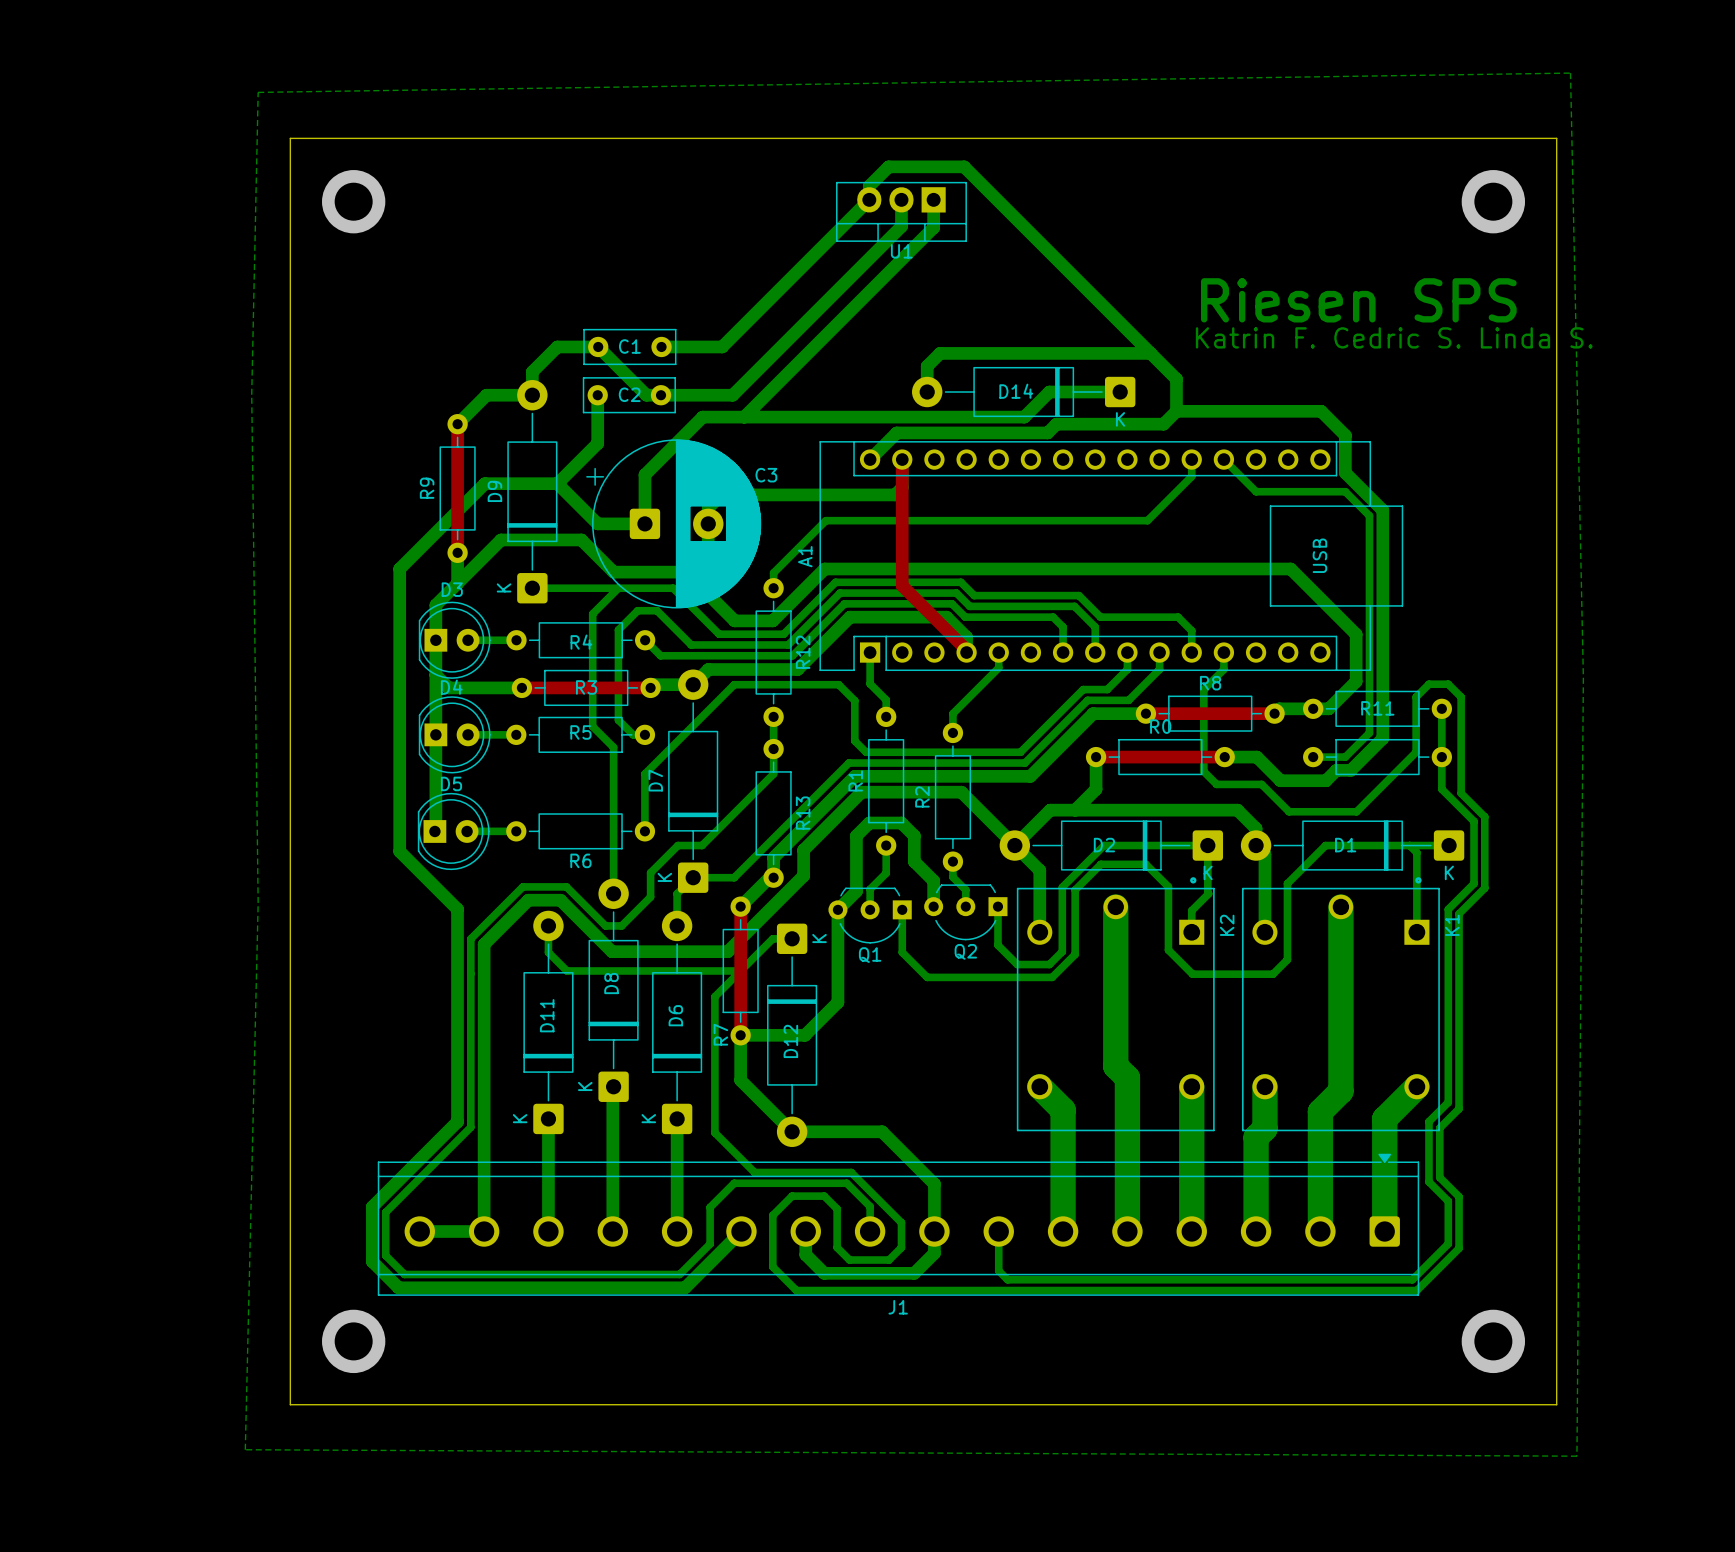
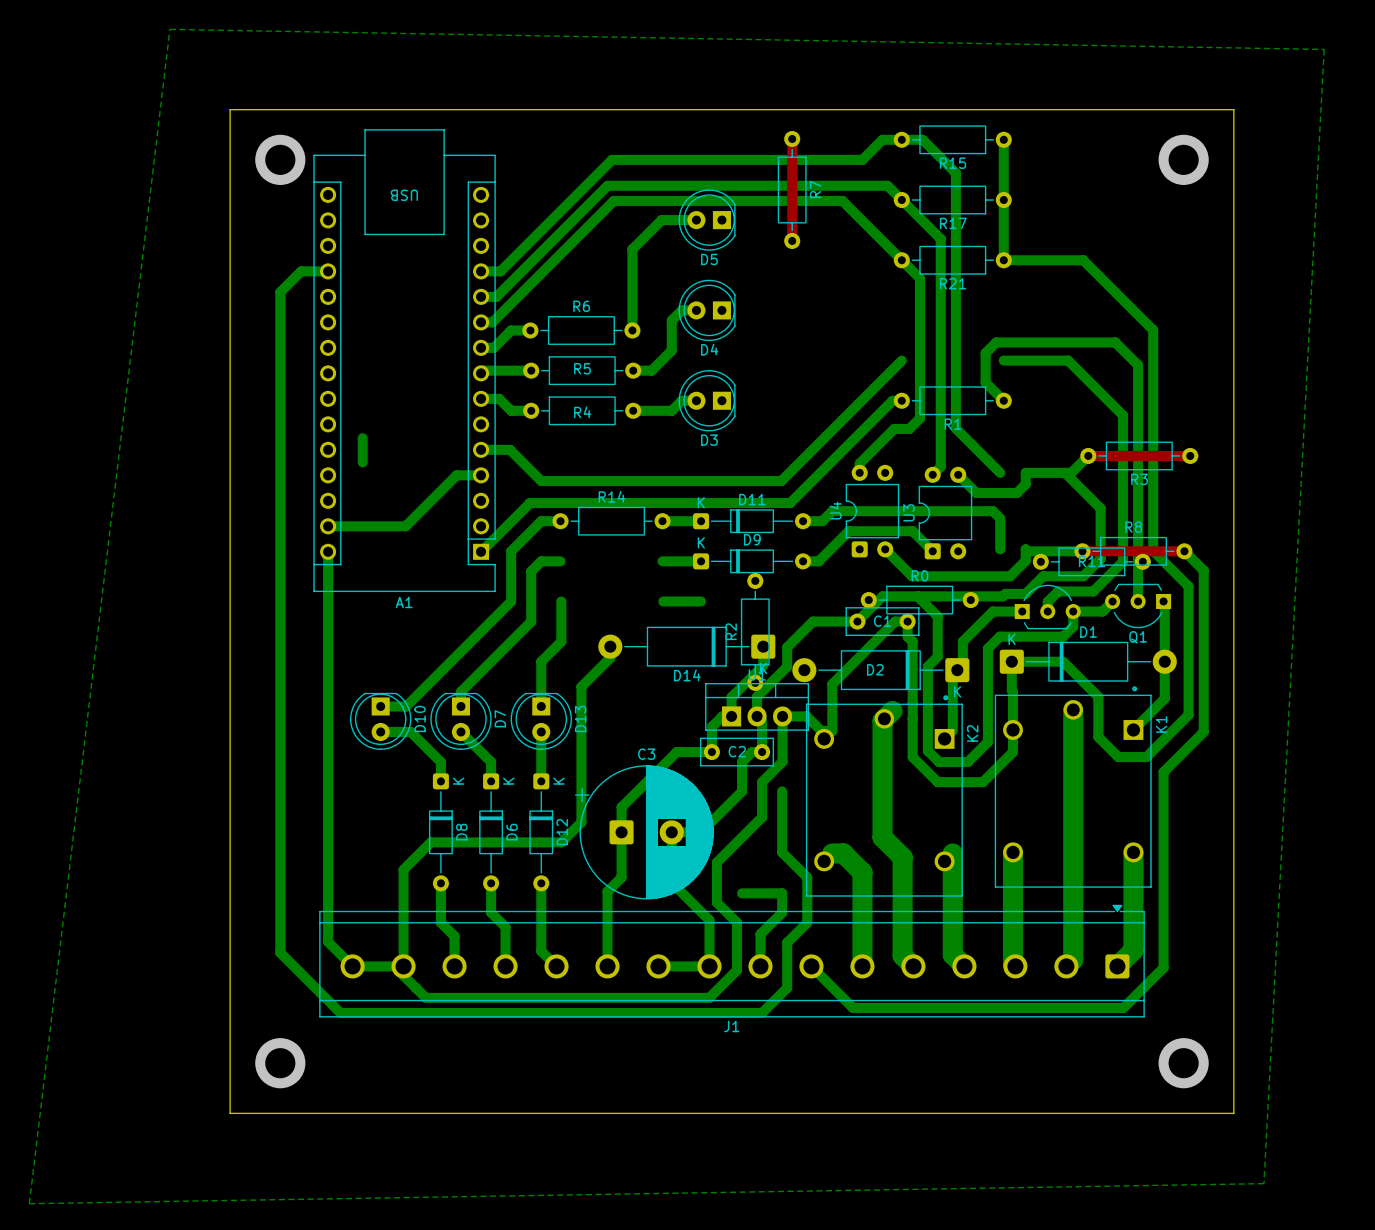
bottom zone outline: (1570, 73) (258, 92) (251, 394) (258, 902) (245, 1449) (1576, 1456) (1583, 677) (1570, 73) -> (169, 29) (29, 1203) (1263, 1183) (1324, 49) (169, 29)
top track: none -> (792, 138) (792, 240)
R15: none -> (952, 139)
bottom track: none -> (1003, 139) (1003, 260) (1083, 260) (1153, 330) (1153, 551) (1188, 586) (1188, 714) (1146, 757) (1118, 757) (1098, 736) (1098, 696) (1063, 661) (1006, 661)
bottom track: (901, 199) (901, 226) (732, 395) (646, 395) (598, 346) (557, 346) (532, 371) (532, 395) (486, 395) (457, 424) -> none
bottom track: (933, 199) (933, 227) (744, 417) -> none
U1 rotation: 0° (901, 211) -> 180° (757, 706)
U1 position: (901, 211) -> (757, 706)
R17: none -> (952, 200)
bottom track: none -> (696, 220) (661, 220) (632, 249) (632, 330)
text: Riesen SPS (1358, 300) -> none
R21: none -> (952, 260)
text: Katrin F. Cedric S. Linda S. (1394, 337) -> none
bottom track: none -> (328, 271) (301, 271) (280, 292) (280, 952) (340, 1013) (762, 1013) (787, 987) (787, 942) (807, 922) (807, 877) (782, 852) (782, 791)
bottom track: none -> (481, 271) (500, 271) (612, 159) (862, 159) (882, 139) (922, 139) (955, 173) (955, 428) (1000, 472)
C1 position: (629, 346) -> (882, 621)
bottom track: (661, 346) (722, 346) (869, 199) (869, 186) (888, 166) (964, 166) (1176, 379) (1176, 411) -> none
bottom track: (1150, 353) (940, 353) (927, 366) (927, 392) -> none
bottom track: none -> (481, 296) (496, 296) (607, 185) (887, 185) (940, 238) (940, 466) (932, 474)
D9 footprint: [507, 380, 558, 604] -> [693, 549, 812, 574]
bottom track: none -> (696, 310) (681, 310) (671, 320) (671, 350) (651, 370) (633, 370)
D14 name position: D14 (1016, 391) -> D14 (687, 675)
D14 position: (1023, 392) -> (686, 646)
bottom track: (1120, 392) (1049, 392) (1024, 417) (702, 417) (644, 474) (644, 523) (597, 523) (557, 483) -> none
bottom track: (597, 395) (597, 443) (557, 483) -> none
C2 position: (629, 395) -> (736, 752)
bottom track: none -> (481, 322) (492, 322) (613, 200) (842, 200) (919, 278) (919, 418) (909, 428) (894, 428) (859, 463) (859, 472)
bottom track: (1176, 411) (1321, 411) (1345, 435) (1345, 472) (1382, 510) (1382, 738) (1350, 770) (1336, 770) (1326, 780) (1280, 780) (1256, 757) (1224, 757) -> none
bottom track: (1176, 411) (1163, 424) (1056, 424) (1047, 432) (896, 432) (870, 459) -> none
bottom track: none -> (530, 330) (511, 330) (493, 347) (481, 347)
top track: (457, 424) (457, 552) -> none
bottom track: none -> (901, 360) (781, 481) (541, 481) (510, 449) (481, 449)
bottom track: none -> (1003, 360) (1068, 360) (1122, 415) (1122, 561) (1093, 591) (1058, 591) (1047, 601) (1047, 611)
bottom track: (902, 459) (902, 487) (895, 494) (721, 494) (708, 508) (708, 549) (685, 572) -> none
top track: (902, 459) (902, 585) (966, 650) (966, 652) -> none
bottom track: (1191, 459) (1191, 476) (1147, 520) (825, 520) (773, 572) (773, 588) -> none
bottom track: (1223, 459) (1256, 491) (1345, 491) (1369, 515) (1369, 732) (1345, 757) (1313, 757) -> none
bottom track: none -> (531, 370) (483, 370) (481, 373)
C3 name position: C3 (766, 475) -> C3 (646, 754)
bottom track: (557, 483) (484, 483) (399, 568) (399, 851) (457, 909) (457, 1121) (372, 1206) (372, 1261) (398, 1287) (685, 1287) (741, 1231) -> none
R9: (457, 488) -> none
D9 name position: D9 (494, 491) -> D9 (752, 539)
bottom track: none -> (481, 398) (499, 398) (511, 410) (531, 410)
bottom track: none -> (696, 400) (681, 400) (671, 410) (633, 410)
bottom track: none -> (901, 400) (892, 400) (790, 503) (530, 503) (481, 551)
bottom track: none -> (1003, 400) (985, 382) (985, 353) (996, 342) (1115, 342) (1138, 365) (1138, 601)
C3 position: (673, 523) -> (644, 832)
A1 rotation: 0° (1111, 556) -> 90° counterclockwise (404, 360)
A1 position: (1111, 556) -> (404, 360)
bottom track: (685, 572) (734, 620) (772, 620) (824, 568) (1290, 568) (1356, 634) (1356, 681) (1328, 708) (1279, 708) (1274, 713) -> none
bottom track: (685, 572) (613, 572) (581, 539) (501, 539) (435, 605) (434, 831) -> none
bottom track: none -> (1088, 455) (1071, 472) (1025, 472) (1025, 484) (1016, 492) (976, 492) (958, 474)
top track: none -> (1088, 455) (1190, 455)
bottom track: (532, 588) (673, 588) (719, 634) (783, 634) (835, 582) (960, 582) (974, 595) (1078, 595) (1100, 617) (1178, 617) (1191, 630) (1191, 652) -> none
bottom track: (618, 588) (592, 613) (592, 726) (613, 747) (613, 893) -> none
bottom track: none -> (1065, 472) (1100, 508) (1100, 559) (1083, 576) (1043, 576) (1025, 593) (1005, 593) (1002, 596) (882, 596) (857, 621) (813, 621) (787, 647) (787, 666) (757, 696) (757, 716) (762, 721) (762, 752) (752, 752) (742, 762) (742, 791) (701, 832) (671, 832) (671, 882) (709, 920) (709, 966) (658, 966)
bottom track: none -> (481, 475) (456, 475) (405, 526) (328, 526)
D3 rotation: 0° (454, 640) -> 180° (707, 400)
D3 position: (454, 640) -> (707, 400)
bottom track: (468, 640) (516, 640) -> none
R4 position: (580, 640) -> (582, 410)
bottom track: (645, 640) (660, 655) (792, 655) (844, 603) (952, 603) (965, 617) (1053, 617) (1063, 627) (1063, 652) -> none
U4: none -> (872, 511)
U3: none -> (945, 513)
R12: (773, 652) -> none
bottom track: (870, 652) (870, 683) (886, 699) (886, 716) -> none
bottom track: (966, 652) (966, 637) (946, 617) (850, 617) (797, 669) (708, 669) (693, 684) (653, 684) (650, 687) -> none
bottom track: (998, 652) (998, 667) (952, 713) (952, 732) -> none
bottom track: (1095, 652) (1095, 627) (1074, 606) (969, 606) (956, 593) (840, 593) (788, 644) (691, 644) (657, 610) (637, 610) (618, 630) (618, 720) (633, 734) (644, 734) -> none
bottom track: (1127, 652) (1127, 669) (1107, 689) (1083, 689) (1020, 752) (866, 752) (854, 740) (854, 700) (838, 684) (734, 684) (644, 773) (644, 831) -> none
bottom track: (1159, 652) (1159, 669) (1128, 700) (1087, 700) (1024, 763) (848, 763) (734, 877) (693, 877) (677, 893) (677, 925) -> none
bottom track: (1223, 652) (1223, 669) (1203, 689) (1203, 771) (1216, 784) (1261, 784) (1289, 811) (1356, 811) (1416, 752) (1416, 697) (1428, 684) (1448, 684) (1461, 697) (1461, 793) (1484, 816) (1484, 888) (1459, 913) (1459, 1108) (1439, 1128) (1439, 1177) (1459, 1196) (1459, 1248) (1416, 1290) (796, 1290) (772, 1266) (772, 1215) (792, 1196) (824, 1196) (837, 1208) (837, 1247) (849, 1260) (889, 1260) (901, 1247) (901, 1222) (851, 1172) (754, 1172) (714, 1132) (714, 996) (772, 938) (792, 938) -> none
bottom track: none -> (560, 521) (541, 521) (511, 551) (511, 601) (406, 706) (380, 706)
R14: none -> (611, 521)
bottom track: none -> (662, 521) (701, 521)
bottom track: none -> (803, 521) (822, 521) (832, 511) (992, 511) (1000, 518) (1000, 549)
D7 footprint: [668, 669, 719, 893] -> [430, 692, 492, 750]
bottom track: (435, 675) (448, 687) (521, 687) -> none
top track: (521, 687) (650, 687) -> none
R3 position: (586, 687) -> (1139, 455)
R3 name position: R3 (586, 687) -> R3 (1139, 479)
bottom track: none -> (885, 549) (912, 576) (1010, 576) (1025, 560) (1025, 549) (1027, 551) (1082, 551)
bottom track: none -> (932, 551) (912, 531) (848, 531) (818, 561) (803, 561)
bottom track: none -> (1184, 551) (1203, 570) (1203, 731) (1163, 772) (1163, 967) (1123, 1007) (853, 1007) (811, 966)
bottom track: none -> (328, 551) (328, 941) (352, 966) (403, 966)
bottom track: none -> (560, 561) (541, 561) (531, 571) (531, 621) (460, 691) (460, 706)
bottom track: none -> (662, 561) (701, 561)
bottom track: (1441, 708) (1441, 789) (1474, 821) (1474, 883) (1448, 909) (1448, 1102) (1428, 1121) (1428, 1181) (1448, 1201) (1448, 1243) (1412, 1279) (1007, 1279) (998, 1270) (998, 1231) -> none
bottom track: (1145, 713) (1093, 713) (1030, 776) (854, 776) (773, 857) (773, 877) (769, 877) (740, 906) -> none
top track: (1145, 713) (1274, 713) -> (1082, 551) (1184, 551)
R8 position: (1210, 713) -> (1133, 551)
bottom track: (773, 716) (773, 773) (702, 845) (677, 845) (650, 872) (650, 896) (621, 925) (605, 925) (566, 886) (522, 886) (470, 938) (470, 1127) (385, 1212) (385, 1255) (404, 1274) (679, 1274) (710, 1244) (710, 1207) (734, 1183) (846, 1183) (870, 1206) (870, 1231) -> none
D4 rotation: 0° (454, 734) -> 180° (707, 310)
D4 position: (454, 734) -> (707, 310)
bottom track: (468, 734) (516, 734) -> none
R5 position: (580, 734) -> (582, 370)
bottom track: none -> (917, 596) (937, 616) (937, 656) (927, 666) (927, 750) (939, 762) (967, 762) (987, 742) (987, 648) (999, 636) (1063, 636) (1073, 626) (1073, 611) (1102, 611) (1112, 601)
bottom track: (1096, 757) (1096, 789) (1075, 810) -> none
top track: (1096, 757) (1224, 757) -> none
part: (1377, 757) -> none
bottom track: none -> (561, 601) (561, 641) (541, 661) (541, 706)
bottom track: none -> (663, 601) (701, 601)
bottom track: none -> (1163, 601) (1164, 698) (1133, 729)
part: none -> (1047, 607)
bottom track: none -> (1022, 611) (992, 611) (962, 641) (962, 661) (952, 671) (952, 730)
D7 name position: D7 (655, 780) -> D7 (500, 718)
R1 name position: R1 (855, 780) -> R1 (953, 424)
R1 rotation: 0° (886, 781) -> 90° clockwise (952, 400)
R1 position: (886, 781) -> (952, 400)
R13: (773, 813) -> none
bottom track: none -> (610, 646) (610, 657) (581, 686) (581, 822) (561, 842) (430, 842) (403, 869) (403, 975) (425, 997) (709, 997) (736, 970) (736, 922) (716, 902) (716, 862) (762, 817) (762, 782) (782, 761) (782, 716) (806, 716) (821, 730) (832, 730) (832, 684) (894, 621) (907, 621) (907, 636) (912, 641) (912, 702)
bottom track: none -> (763, 646) (763, 665) (731, 697) (731, 716) (722, 716) (711, 726) (711, 752) (676, 752) (621, 807) (621, 877) (607, 891) (607, 966) (611, 962)
D5 rotation: 0° (453, 831) -> 180° (707, 220)
D5 position: (453, 831) -> (707, 220)
bottom track: (467, 831) (516, 831) -> none
R6 position: (580, 831) -> (581, 330)
bottom track: none -> (1011, 661) (1013, 752) (982, 782) (937, 782) (912, 757) (912, 719)
bottom track: (886, 845) (886, 873) (870, 889) (870, 909) -> none
bottom track: (1014, 845) (1050, 810) (1237, 810) (1256, 828) (1256, 845) (1264, 854) (1264, 932) -> none
D1 name position: D1 (1345, 845) -> D1 (1088, 632)
D1 rotation: 0° (1352, 845) -> 180° (1088, 661)
bottom track: (1409, 845) (1416, 852) (1416, 932) -> none
bottom track: (1449, 845) (1325, 845) (1287, 883) (1287, 959) (1272, 974) (1192, 974) (1168, 950) (1168, 886) (1145, 864) (1100, 864) (1075, 890) (1075, 954) (1052, 977) (927, 977) (902, 952) (902, 909) -> none
R6 name position: R6 (580, 860) -> R6 (581, 306)
bottom track: (952, 861) (952, 877) (965, 890) (965, 906) -> none
D8 footprint: [588, 878, 639, 1102] -> [429, 773, 453, 892]
bottom track: none -> (912, 702) (912, 719)
bottom track: none -> (1073, 709) (1073, 959) (1066, 966)
bottom track: none -> (892, 710) (882, 720) (882, 837) (902, 857) (902, 955) (913, 966)
top track: (740, 906) (740, 1035) -> none
bottom track: (933, 906) (933, 880) (914, 861) (914, 835) (901, 823) (869, 823) (856, 835) (856, 891) (837, 909) (837, 1002) (804, 1035) (740, 1035) (740, 1080) (792, 1131) (882, 1131) (934, 1184) (934, 1253) (914, 1273) (824, 1273) (805, 1254) (805, 1231) -> none
bottom track: (997, 906) (997, 945) (1017, 964) (1049, 964) (1062, 951) (1062, 887) (1104, 845) (1207, 845) (1208, 893) (1191, 910) (1191, 932) -> none
bottom track: (1115, 906) (1115, 1066) (1127, 1077) (1127, 1231) -> none
bottom track: (1340, 906) (1340, 1091) (1320, 1111) (1320, 1231) -> none
D10: none -> (380, 721)
D11 footprint: [523, 910, 574, 1135] -> [693, 509, 812, 534]
D6 footprint: [652, 910, 703, 1135] -> [479, 773, 503, 892]
D13: none -> (541, 721)
Q2: (965, 912) -> none
Q1 position: (870, 915) -> (1138, 606)
bottom track: none -> (380, 731) (410, 731) (440, 762) (440, 781)
bottom track: none -> (460, 731) (491, 762) (491, 781)
bottom track: none -> (541, 731) (541, 781)
D12 footprint: [767, 923, 818, 1147] -> [529, 773, 554, 892]
bottom track: (548, 925) (548, 952) (566, 970) (740, 970) -> none
bottom track: (1039, 932) (1039, 870) (961, 792) (861, 792) (803, 850) (803, 875) (727, 951) (611, 951) (560, 900) (528, 900) (484, 944) (484, 1231) (419, 1231) -> none
R7 position: (740, 970) -> (792, 189)
D8 name position: D8 (611, 983) -> D8 (461, 832)
K1 position: (1340, 1004) -> (1073, 787)
D6 name position: D6 (675, 1015) -> D6 (511, 832)
R7 name position: R7 (720, 1034) -> R7 (815, 189)
D12 name position: D12 (790, 1041) -> D12 (562, 832)
bottom track: none -> (1013, 852) (1013, 964) (1015, 966)
bottom track: none -> (1133, 852) (1133, 950) (1117, 966)
bottom track: none -> (832, 853) (843, 853) (862, 872) (862, 966)
bottom track: none -> (952, 853) (952, 954) (964, 966)
bottom track: (613, 1086) (612, 1231) -> none
bottom track: (1039, 1086) (1063, 1110) (1063, 1231) -> none
bottom track: (1191, 1086) (1191, 1231) -> none
bottom track: (1264, 1086) (1264, 1128) (1256, 1137) (1256, 1231) -> none
bottom track: (1416, 1086) (1384, 1118) (1384, 1231) -> none
bottom track: none -> (440, 883) (440, 922) (454, 936) (454, 966)
bottom track: none -> (491, 883) (491, 912) (505, 927) (505, 966)
bottom track: none -> (541, 883) (541, 951) (556, 966)
bottom track: (548, 1118) (548, 1231) -> none
bottom track: (677, 1118) (677, 1231) -> none
bottom track: none -> (742, 893) (782, 893) (782, 912) (760, 934) (760, 966)
J1 position: (898, 1224) -> (731, 961)

